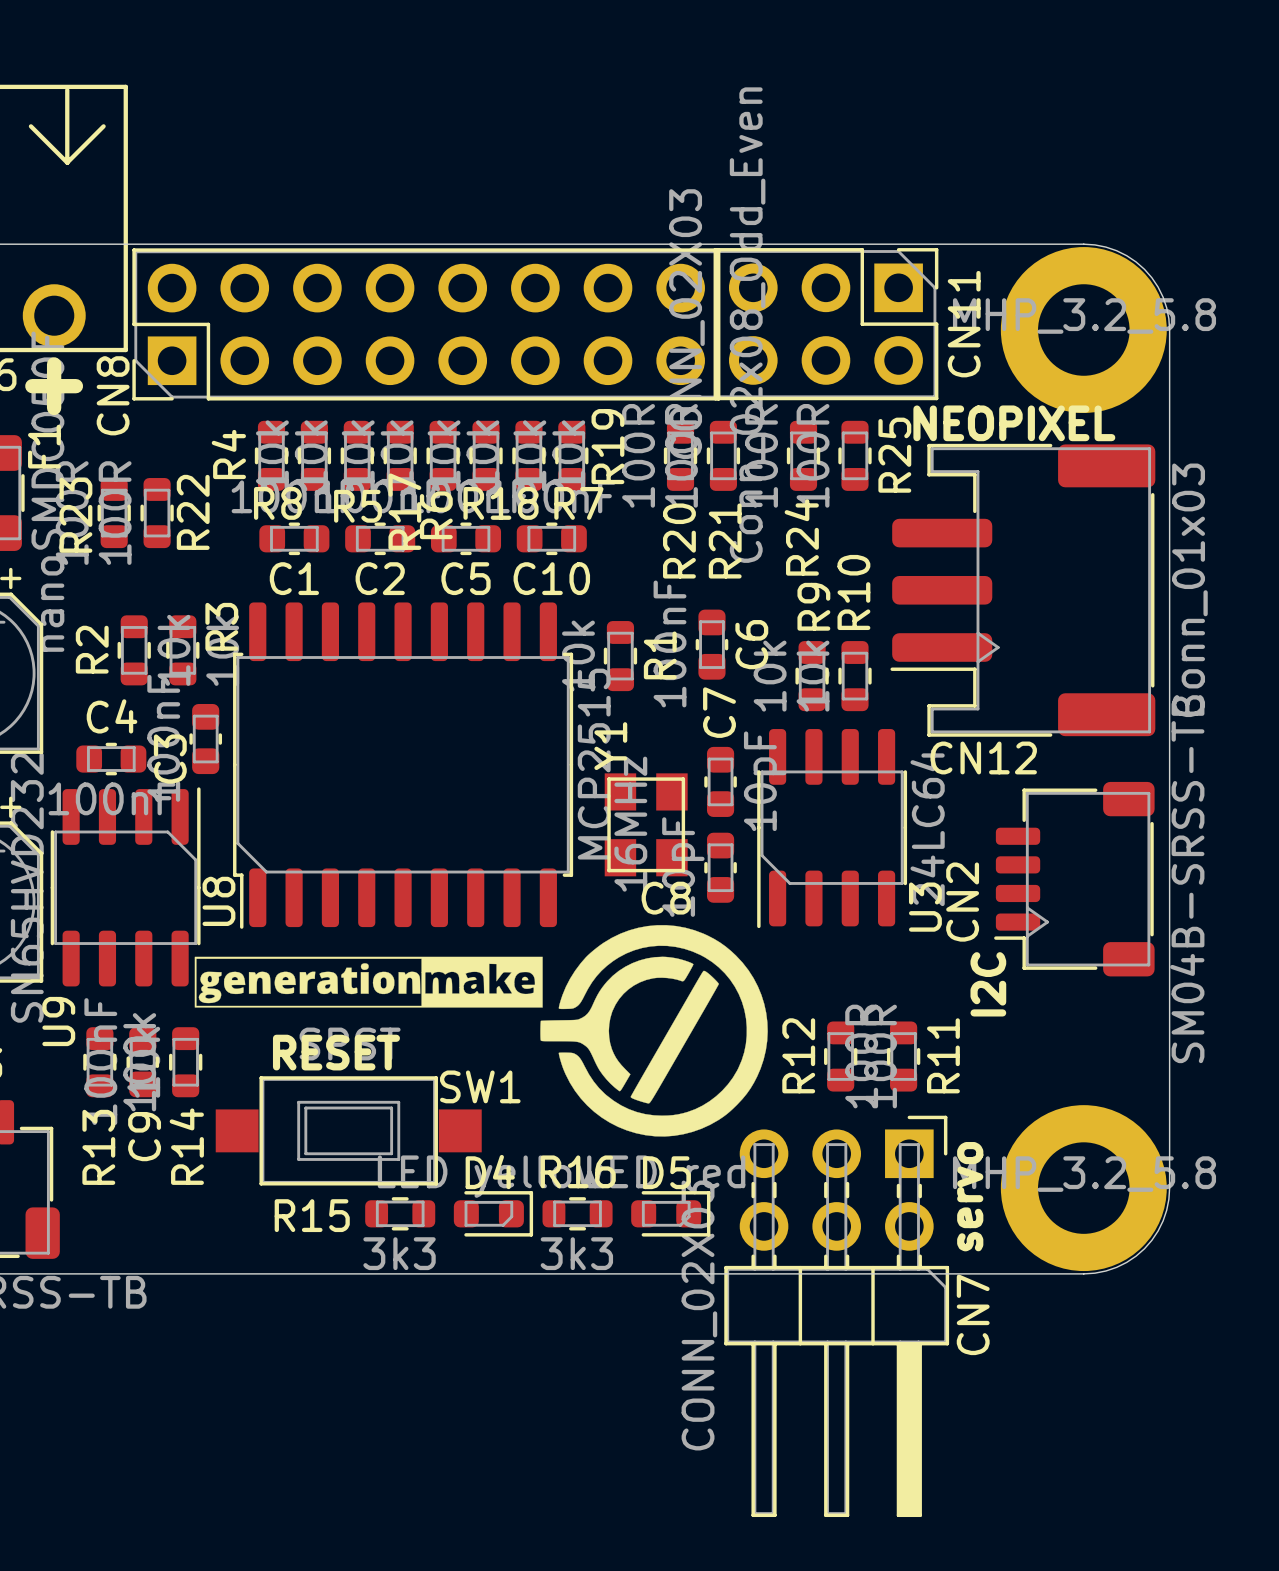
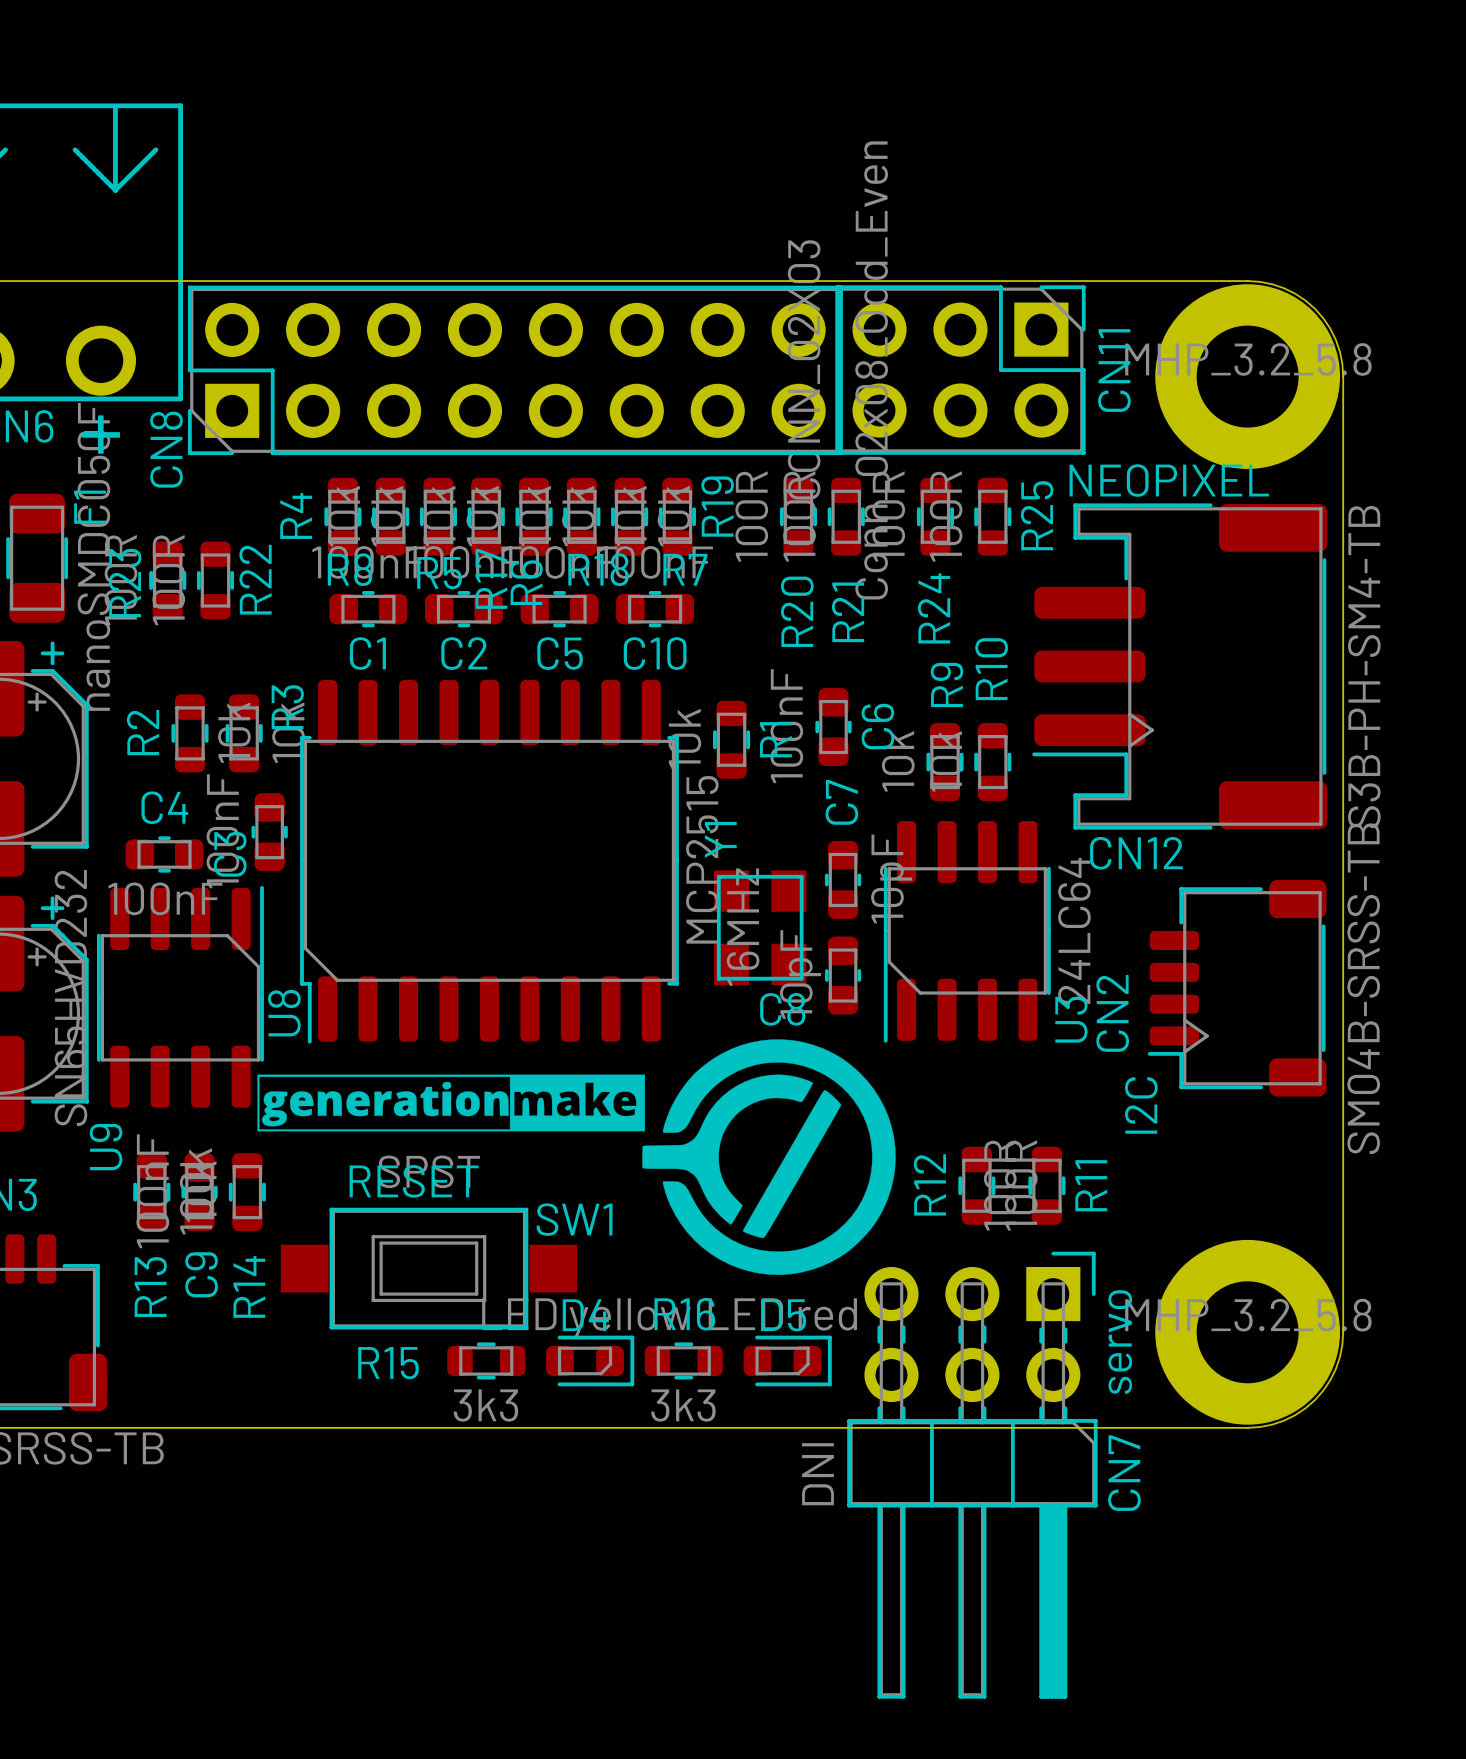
CN12 value: Conn_01x03 (1189, 590) -> S3B-PH-SM4-TB (1364, 666)
CN7 value: CONN_02X03 (699, 1315) -> DNI (817, 1474)

